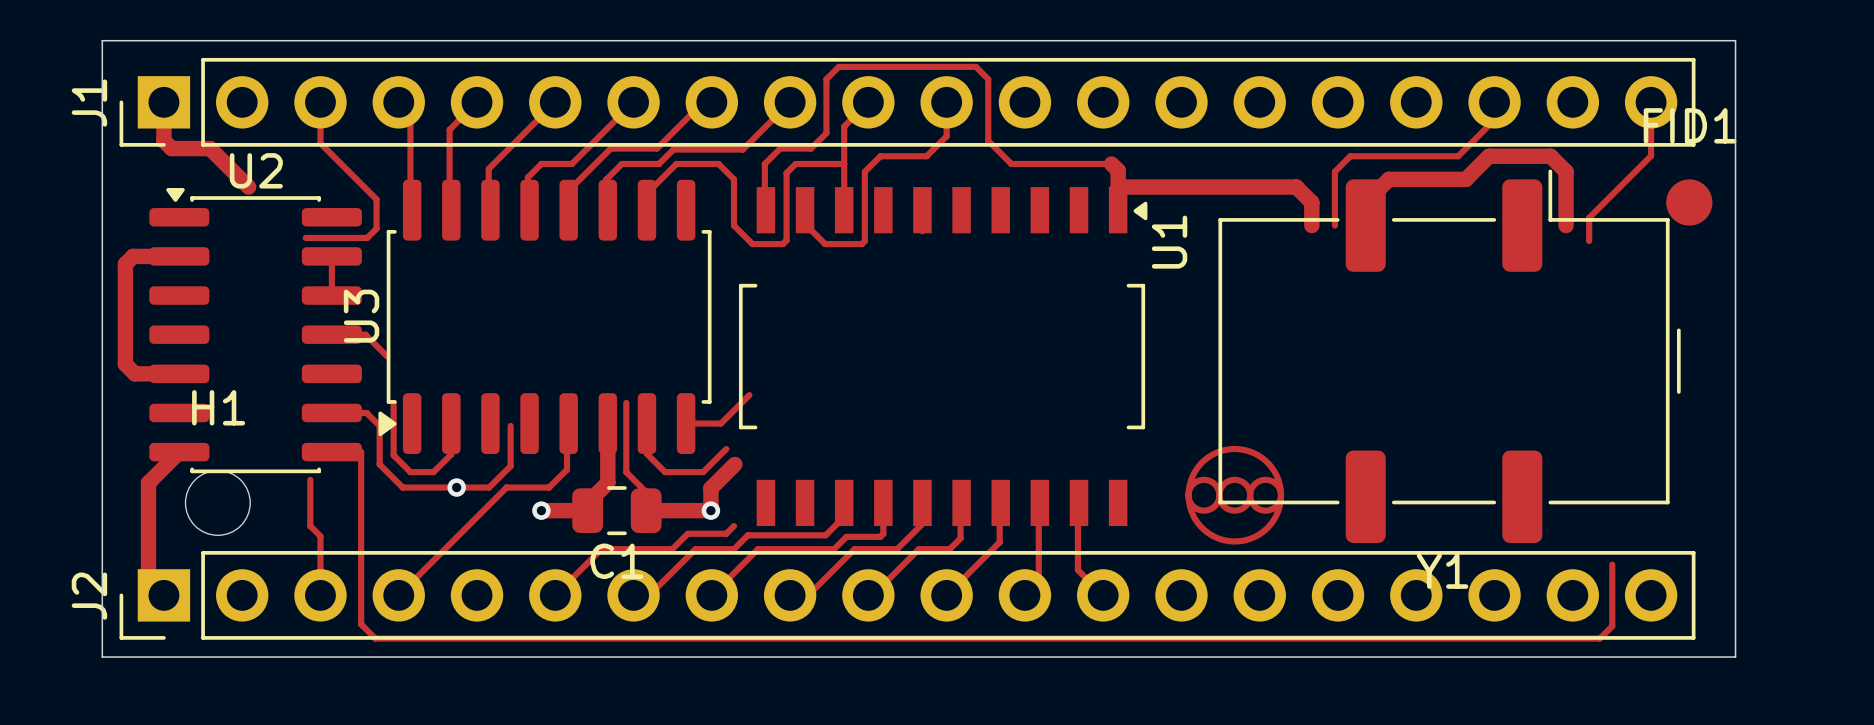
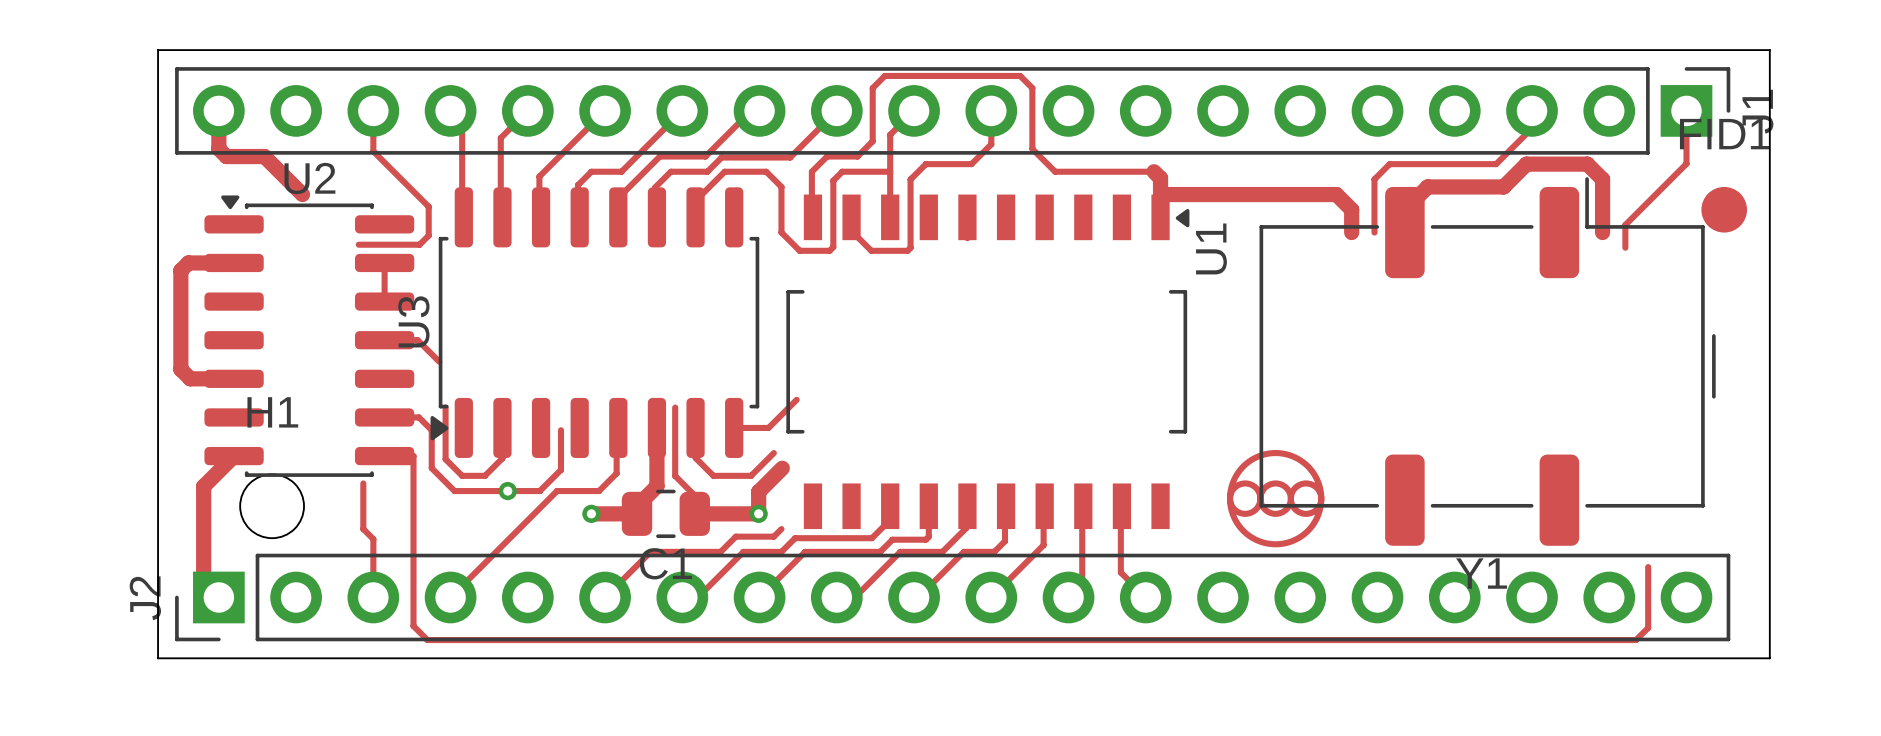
J1 rotation: 0° (907, 102) -> 180° (952, 110)

